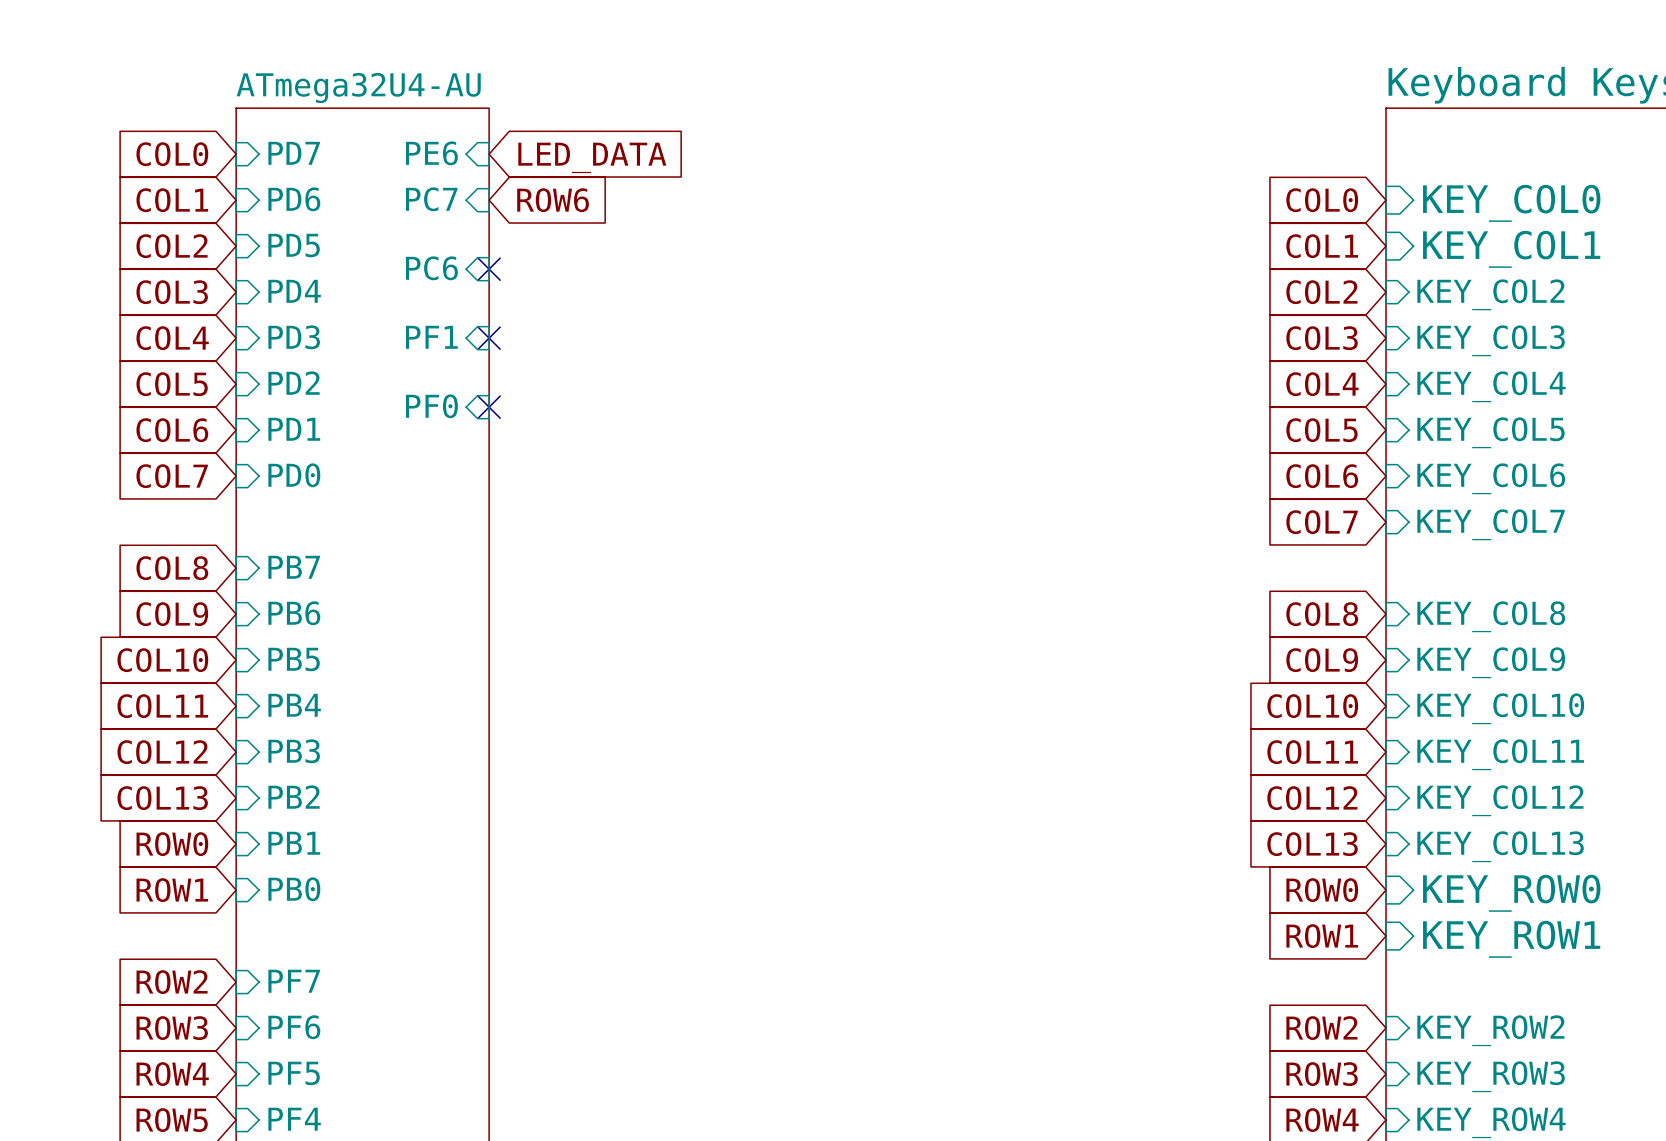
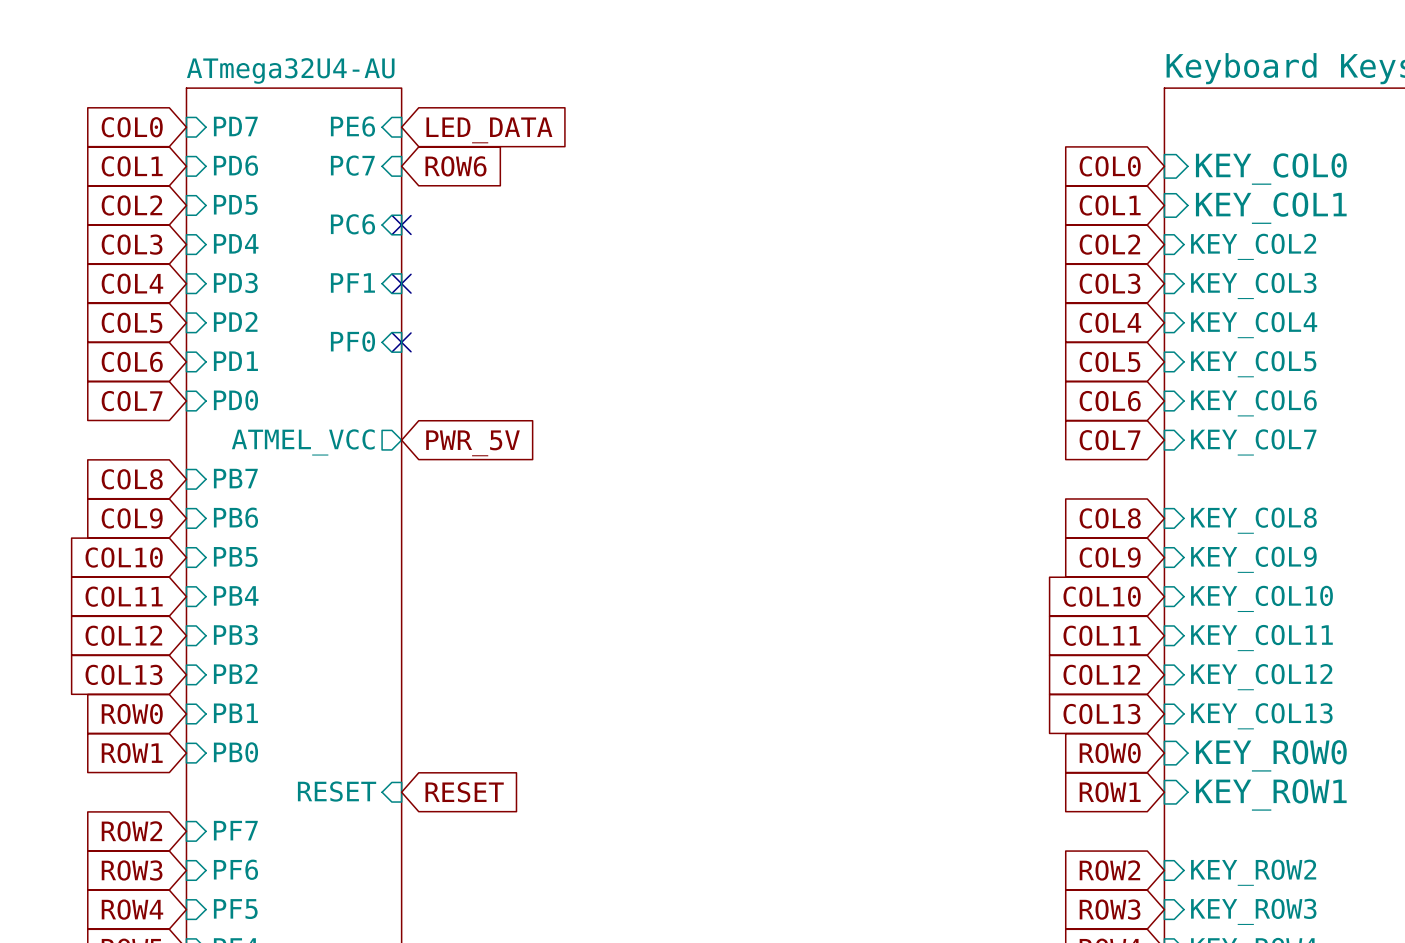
sheet pin: none -> ATMEL_VCC (303, 442)
global label: none -> PWR_5V (473, 443)
sheet pin: none -> RESET (337, 791)
global label: none -> RESET (464, 792)

